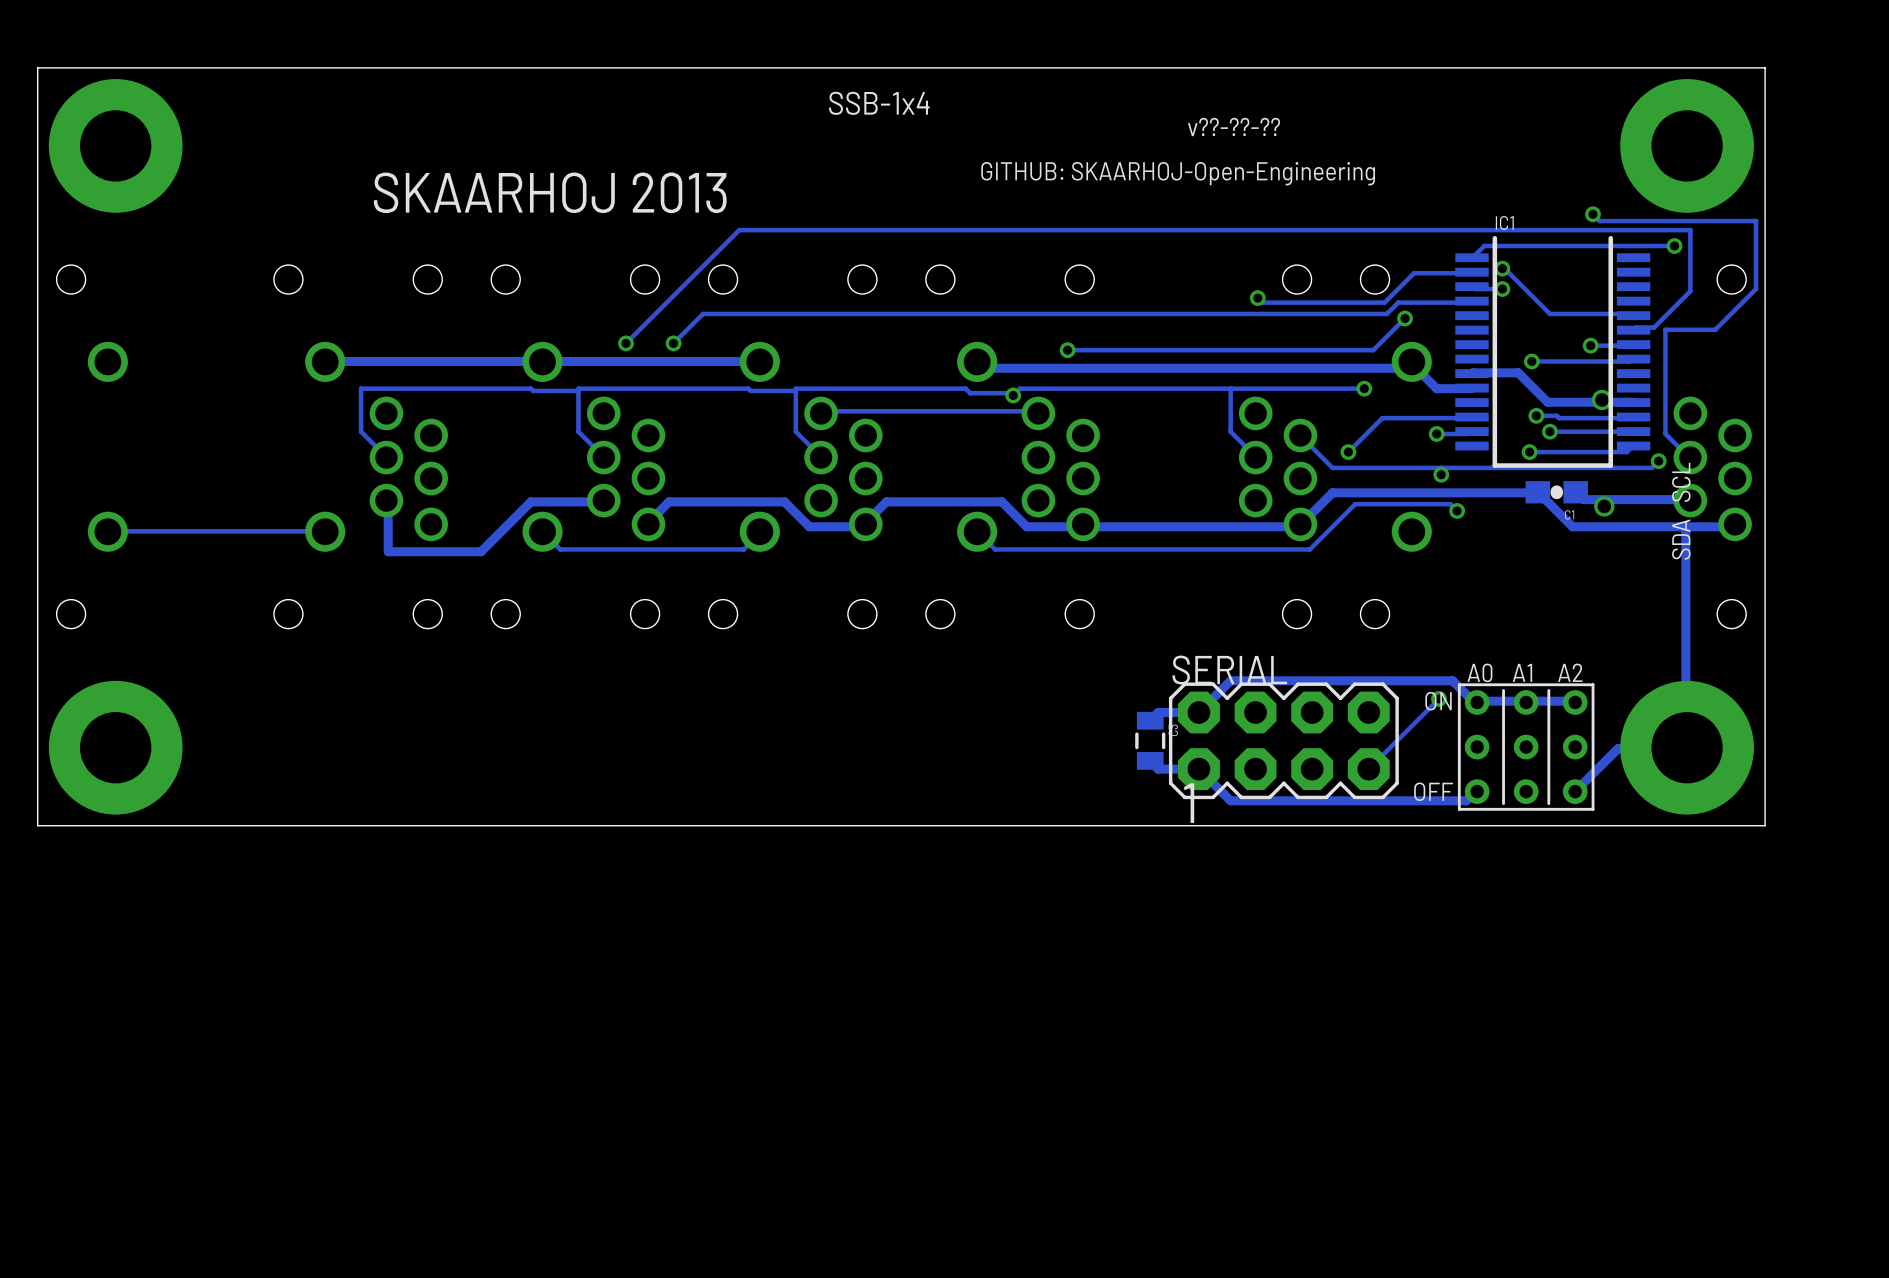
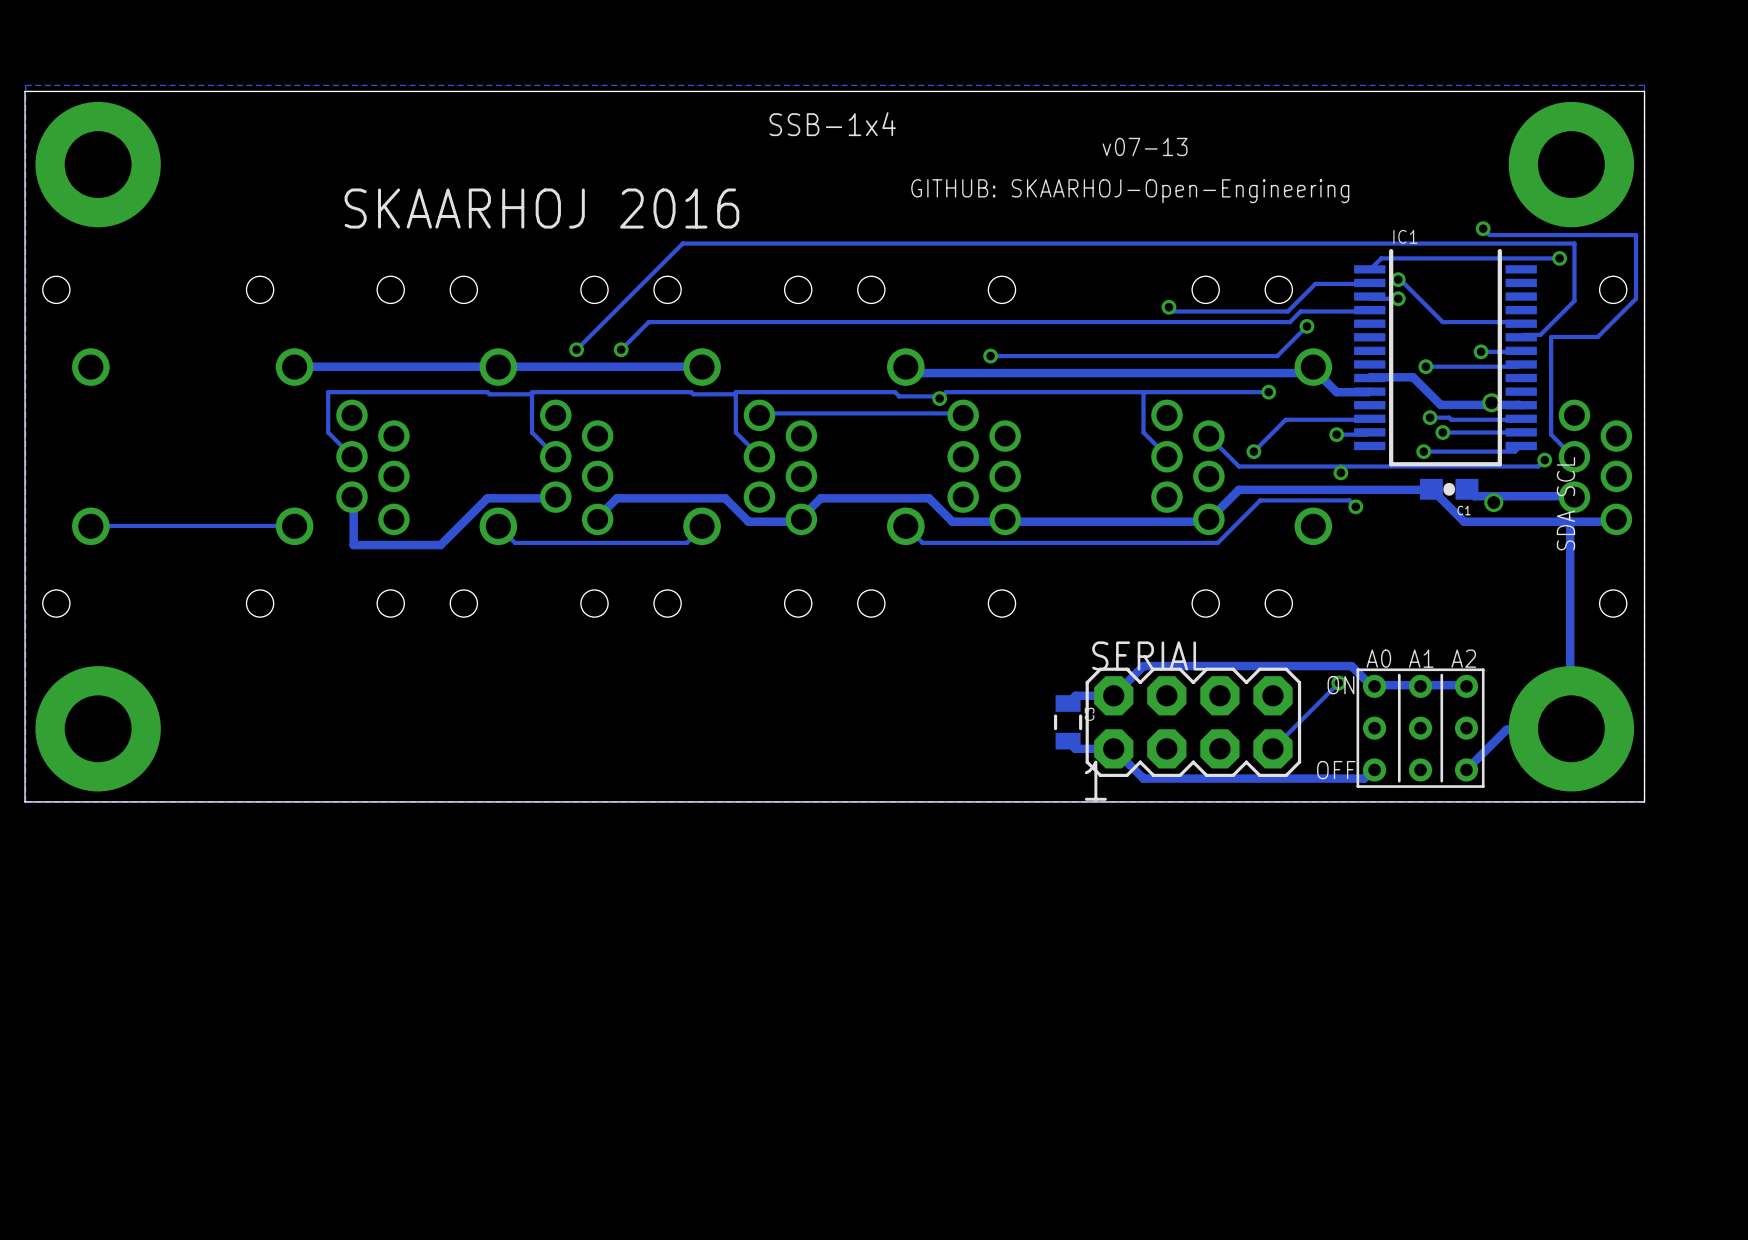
zone outline: none -> (1644, 85) (25, 85) (25, 801) (1644, 801) (1644, 85)
text: v??-??-?? (1233, 126) -> v07-13 (1145, 146)
text: SKAARHOJ 2013 (550, 192) -> SKAARHOJ 2016 (541, 208)

